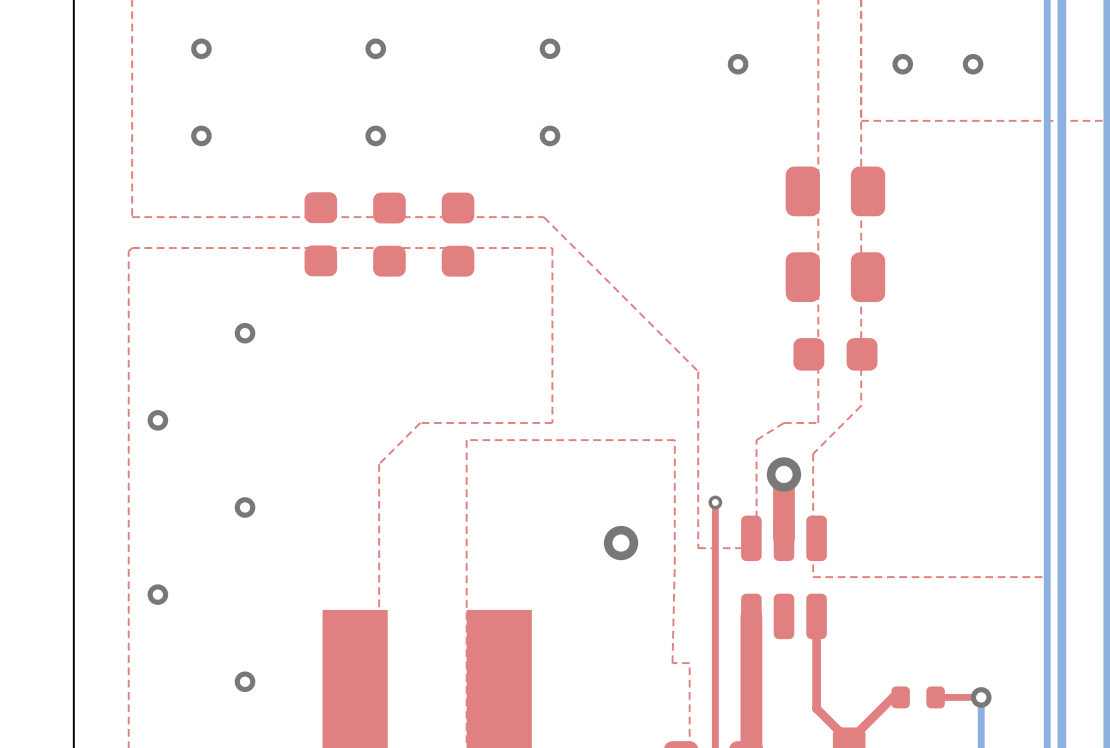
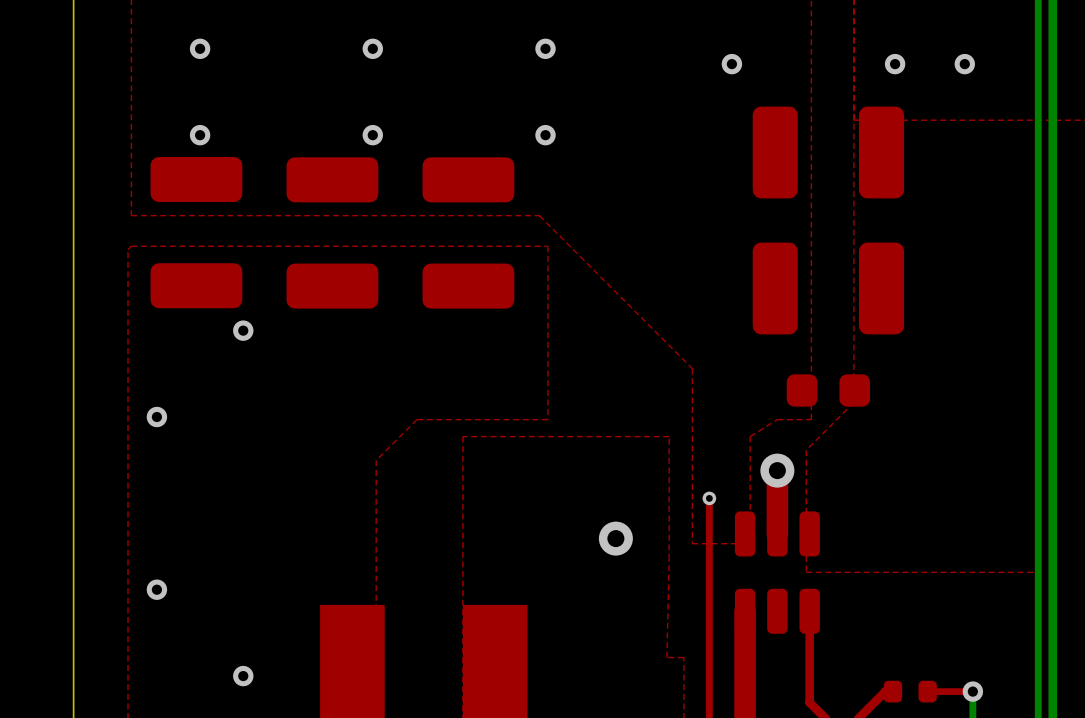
part: none -> (828, 152)
part: (835, 191) -> none
part footprint: [304, 192, 338, 277] -> [286, 157, 379, 309]
part footprint: [441, 192, 475, 277] -> [422, 157, 515, 309]
part: none -> (196, 232)
part: (389, 234) -> none
part footprint: [785, 252, 886, 303] -> [752, 242, 905, 335]
part position: (835, 354) -> (828, 390)
via: (245, 507) -> none

